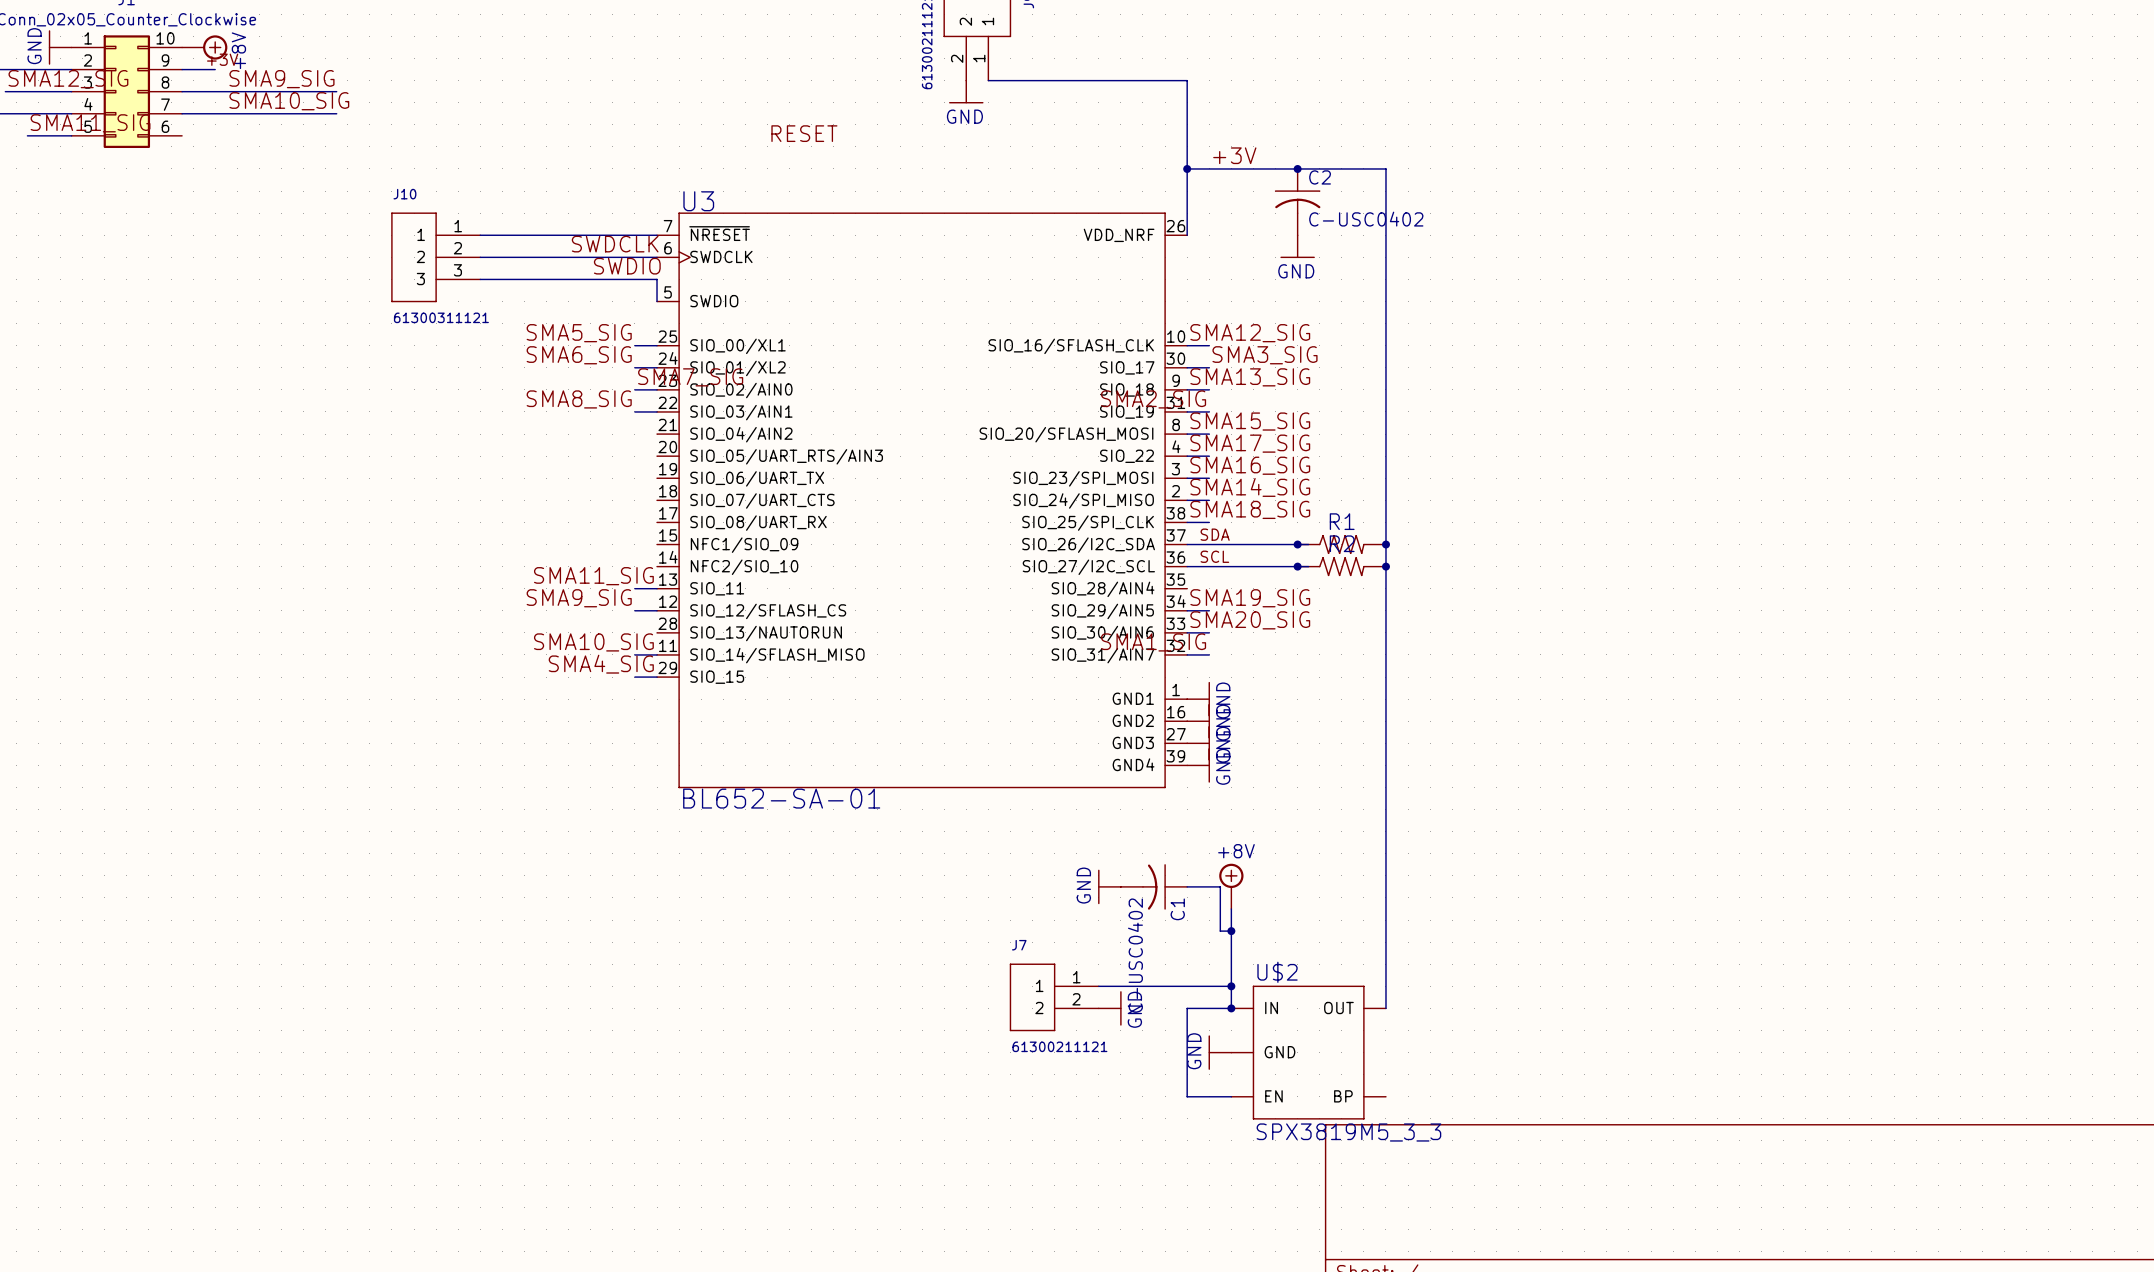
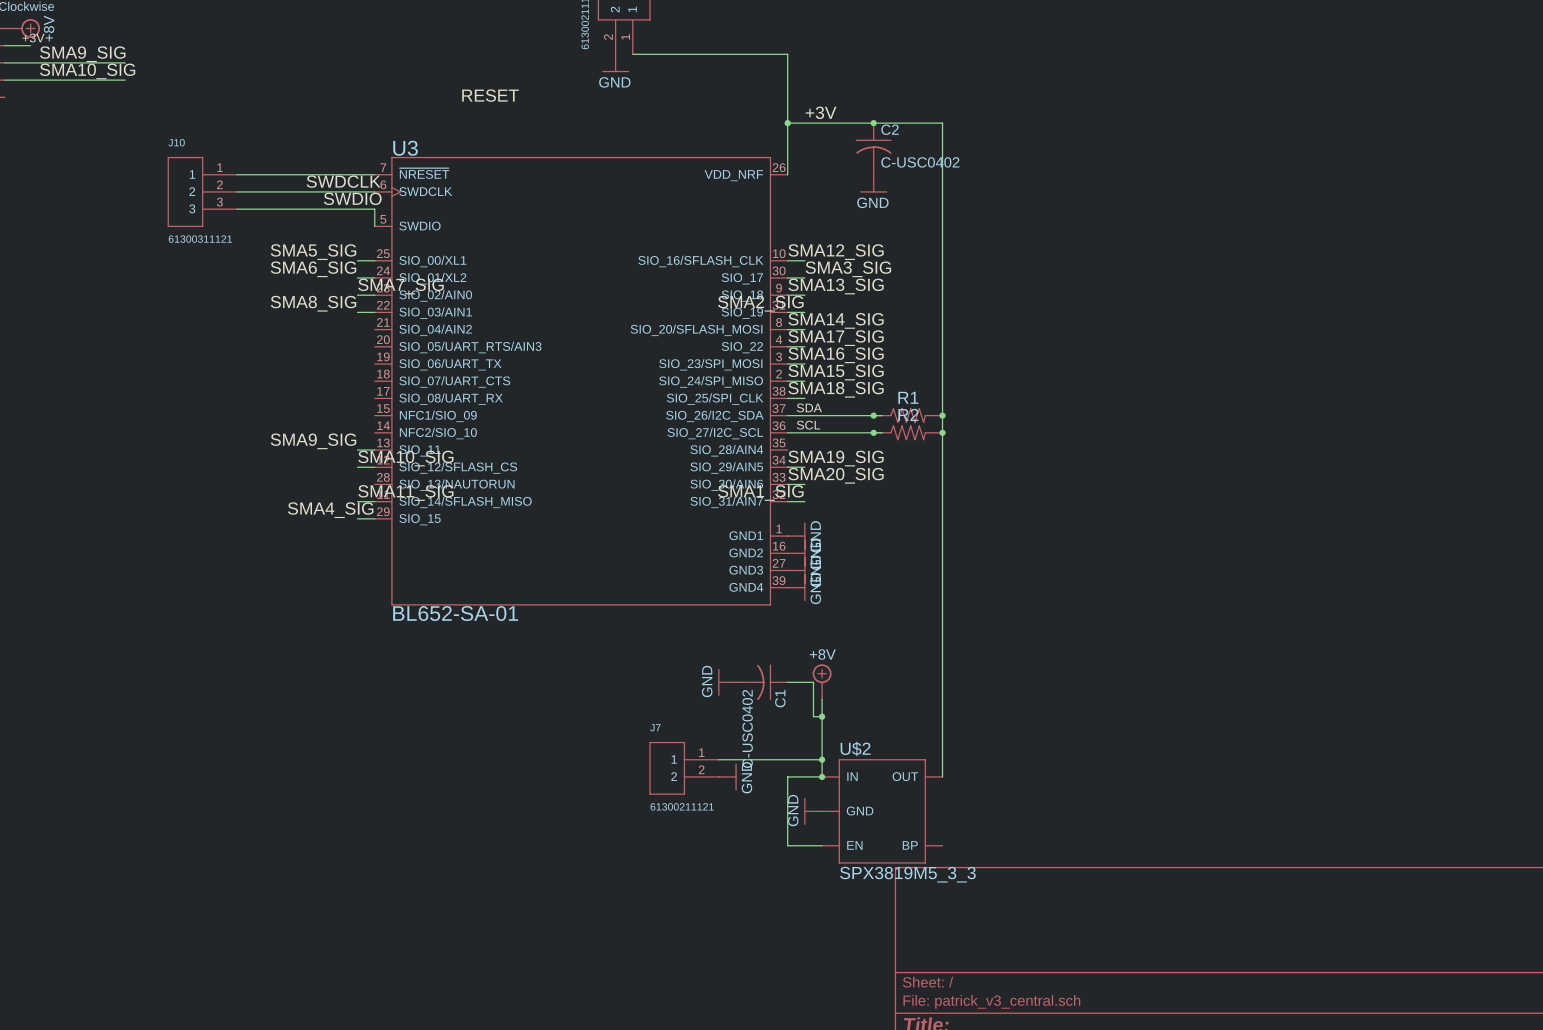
label: SMA15_SIG (1250, 421) -> SMA14_SIG (836, 320)
label: SMA14_SIG (1250, 487) -> SMA15_SIG (836, 372)
label: none -> SMA9_SIG (313, 441)
label position: SMA11_SIG (593, 576) -> SMA11_SIG (405, 492)
label: SMA9_SIG (579, 598) -> SMA10_SIG (405, 458)
label: SMA10_SIG (593, 642) -> none

